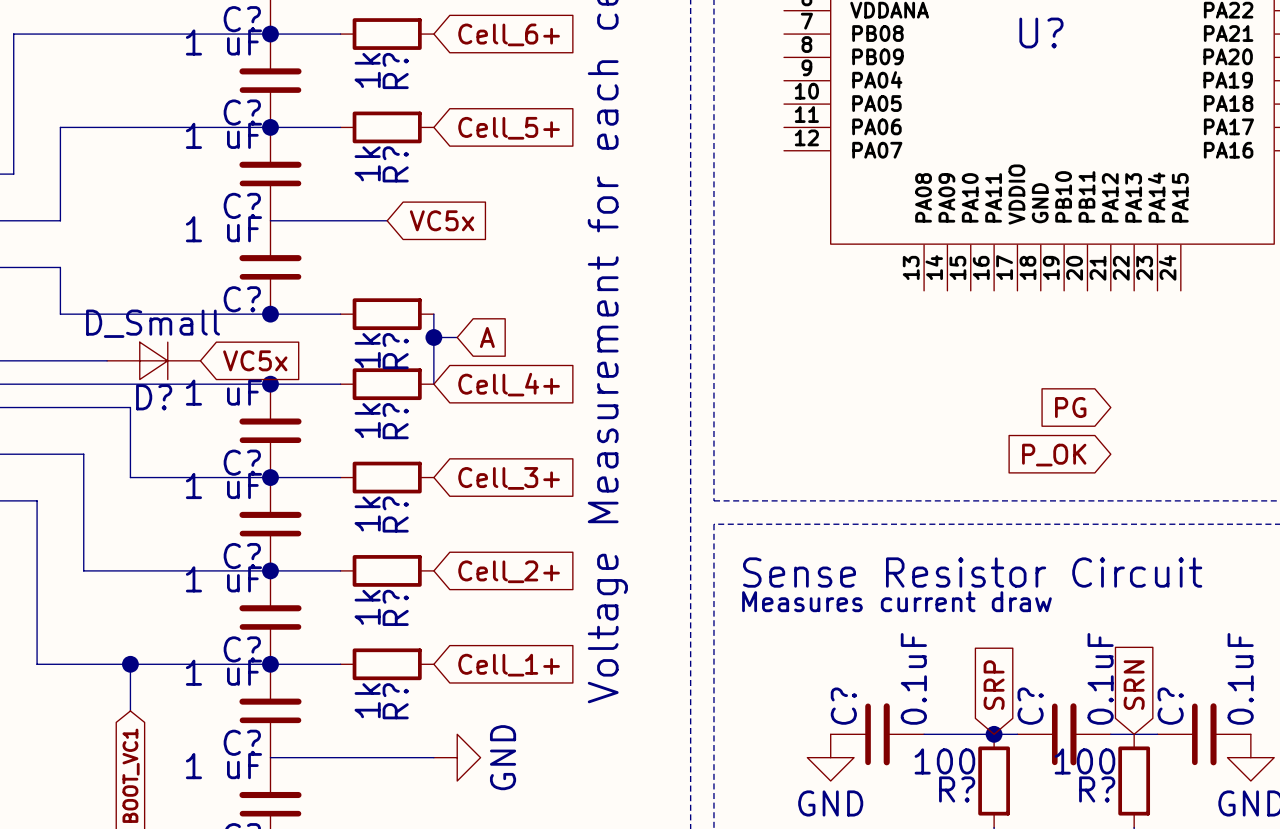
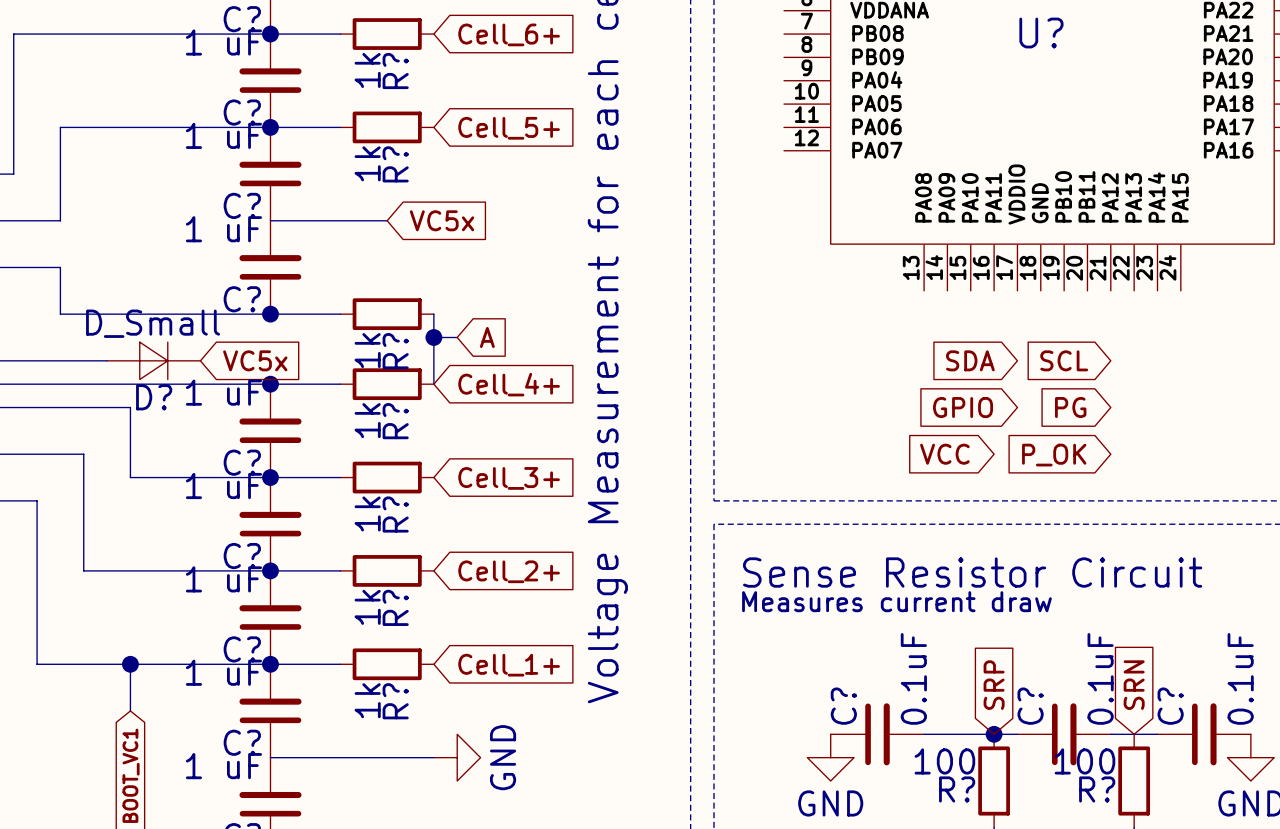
global label: none -> SDA (970, 360)
global label: none -> SCL (1064, 360)
global label: none -> GPIO (963, 407)
global label: none -> VCC (944, 454)

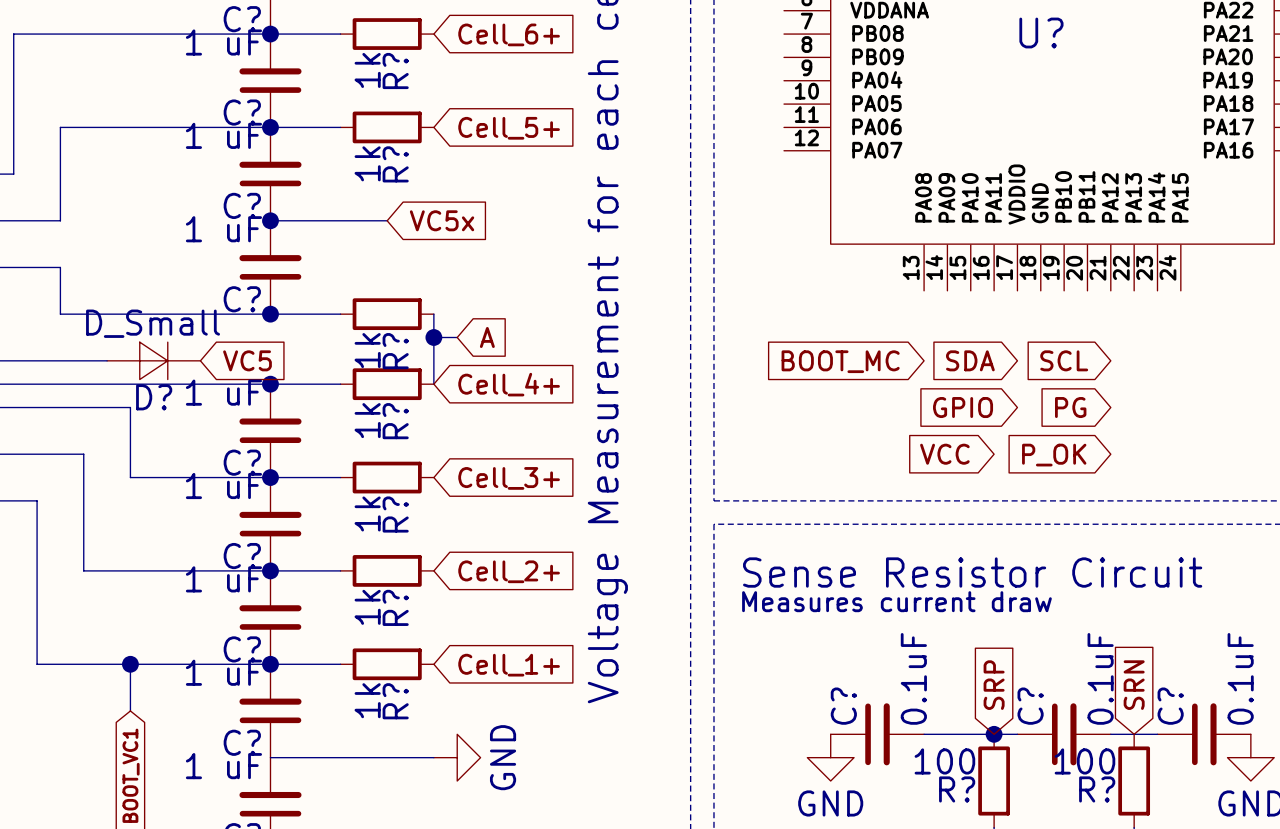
junction: none -> (270, 220)
global label: VC5x (255, 360) -> VC5 (247, 360)
global label: none -> BOOT_MC (840, 361)

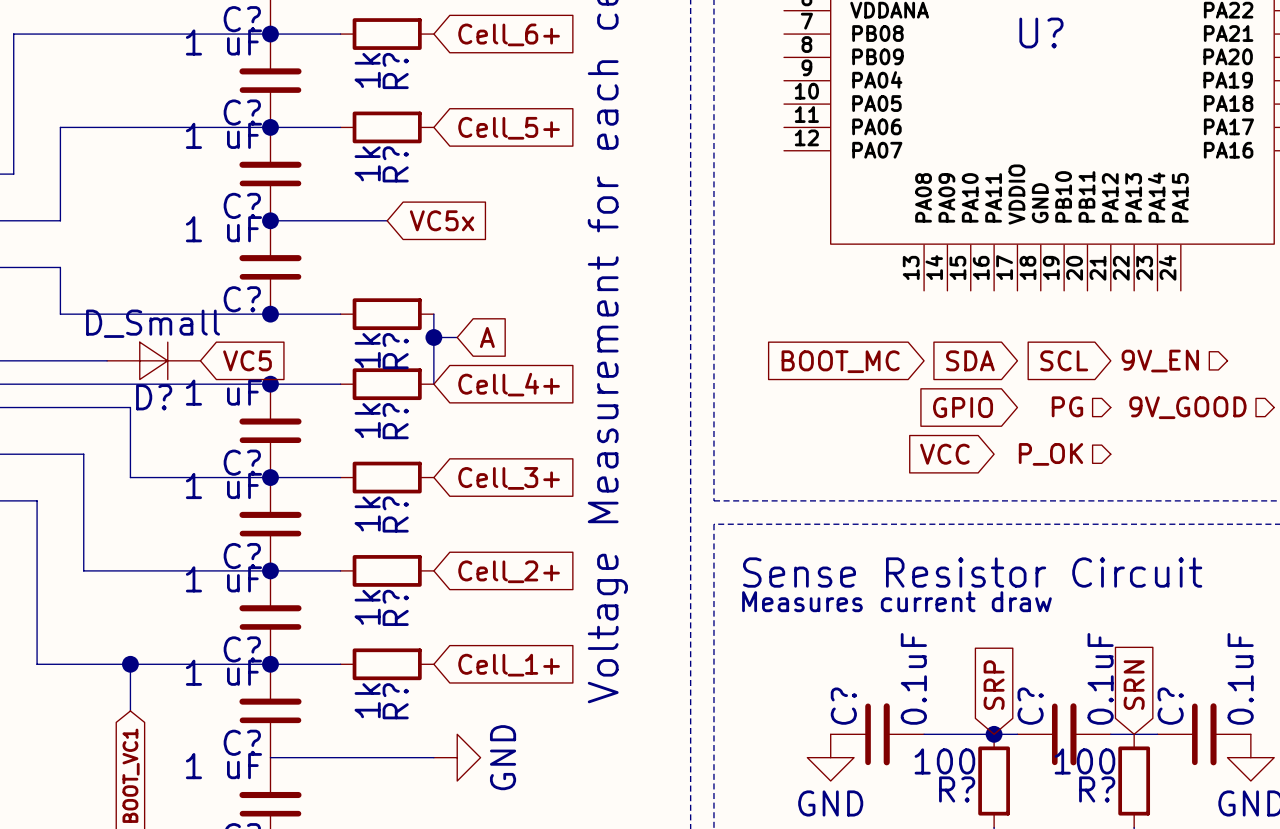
hierarchical label: none -> 9V_EN (1160, 361)
hierarchical label: none -> PG (1067, 406)
global label: PG (1070, 407) -> none
hierarchical label: none -> 9V_GOOD (1187, 407)
hierarchical label: none -> P_OK (1050, 454)
global label: P_OK (1054, 455) -> none

